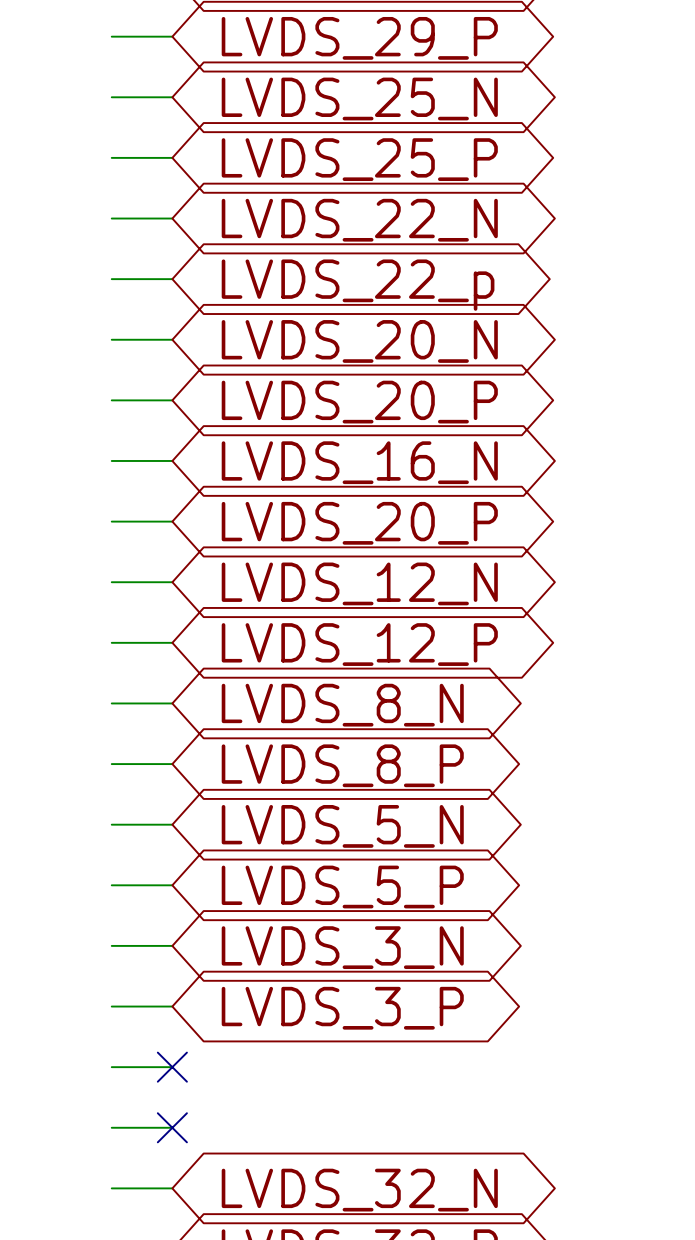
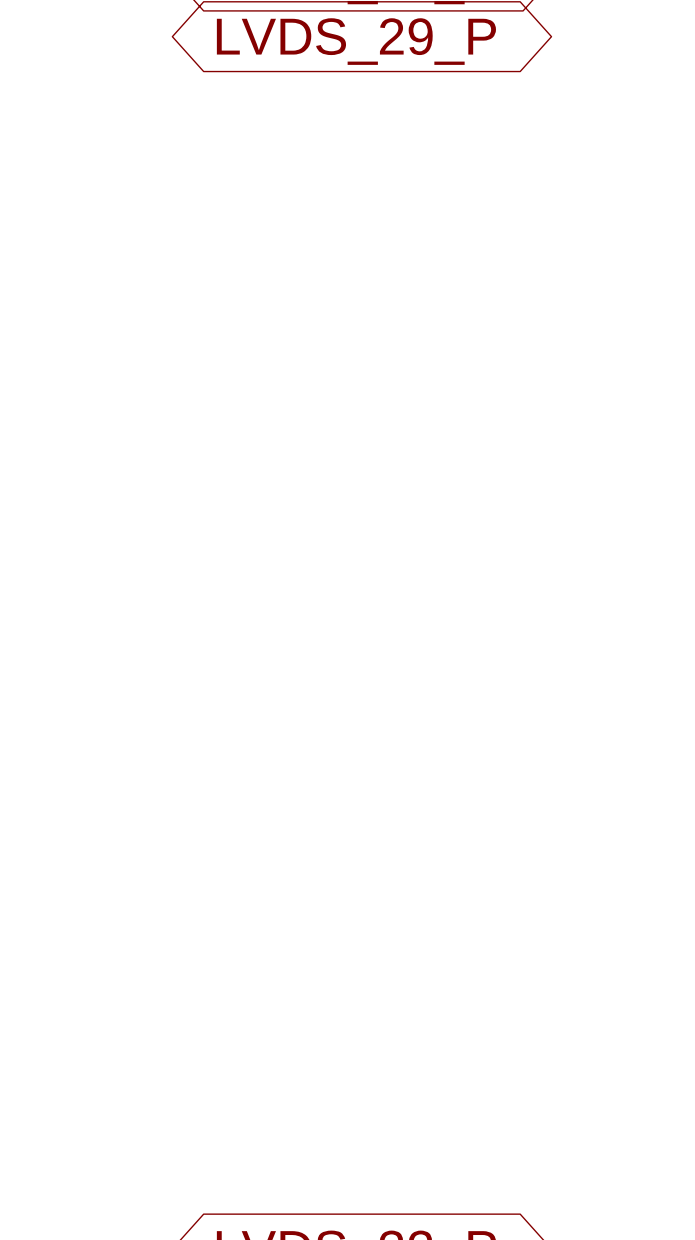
wire: (111, 36) (172, 36) -> none
wire: (111, 97) (172, 97) -> none
global label: LVDS_25_N (359, 98) -> none
wire: (111, 157) (172, 157) -> none
global label: LVDS_25_P (359, 159) -> none
wire: (111, 218) (172, 218) -> none
global label: LVDS_22_N (359, 220) -> none
wire: (111, 279) (172, 279) -> none
global label: LVDS_22_p (358, 285) -> none
wire: (111, 339) (172, 339) -> none
global label: LVDS_20_N (359, 341) -> none
wire: (111, 400) (172, 400) -> none
global label: LVDS_20_P (359, 402) -> none
wire: (111, 460) (172, 460) -> none
global label: LVDS_16_N (359, 462) -> none
wire: (111, 521) (172, 521) -> none
global label: LVDS_20_P (359, 523) -> none
wire: (111, 582) (172, 582) -> none
global label: LVDS_12_N (359, 583) -> none
wire: (111, 642) (172, 642) -> none
global label: LVDS_12_P (359, 644) -> none
wire: (111, 703) (172, 703) -> none
global label: LVDS_8_N (342, 705) -> none
wire: (111, 764) (172, 764) -> none
global label: LVDS_8_P (342, 765) -> none
wire: (111, 824) (172, 824) -> none
global label: LVDS_5_N (342, 826) -> none
wire: (111, 885) (172, 885) -> none
global label: LVDS_5_P (342, 887) -> none
wire: (111, 945) (172, 945) -> none
global label: LVDS_3_N (342, 947) -> none
wire: (111, 1006) (172, 1006) -> none
global label: LVDS_3_P (342, 1008) -> none
wire: (111, 1067) (172, 1067) -> none
no-connect mark: (172, 1067) -> none
wire: (111, 1127) (172, 1127) -> none
no-connect mark: (172, 1127) -> none
wire: (111, 1188) (172, 1188) -> none
global label: LVDS_32_N (359, 1190) -> none

